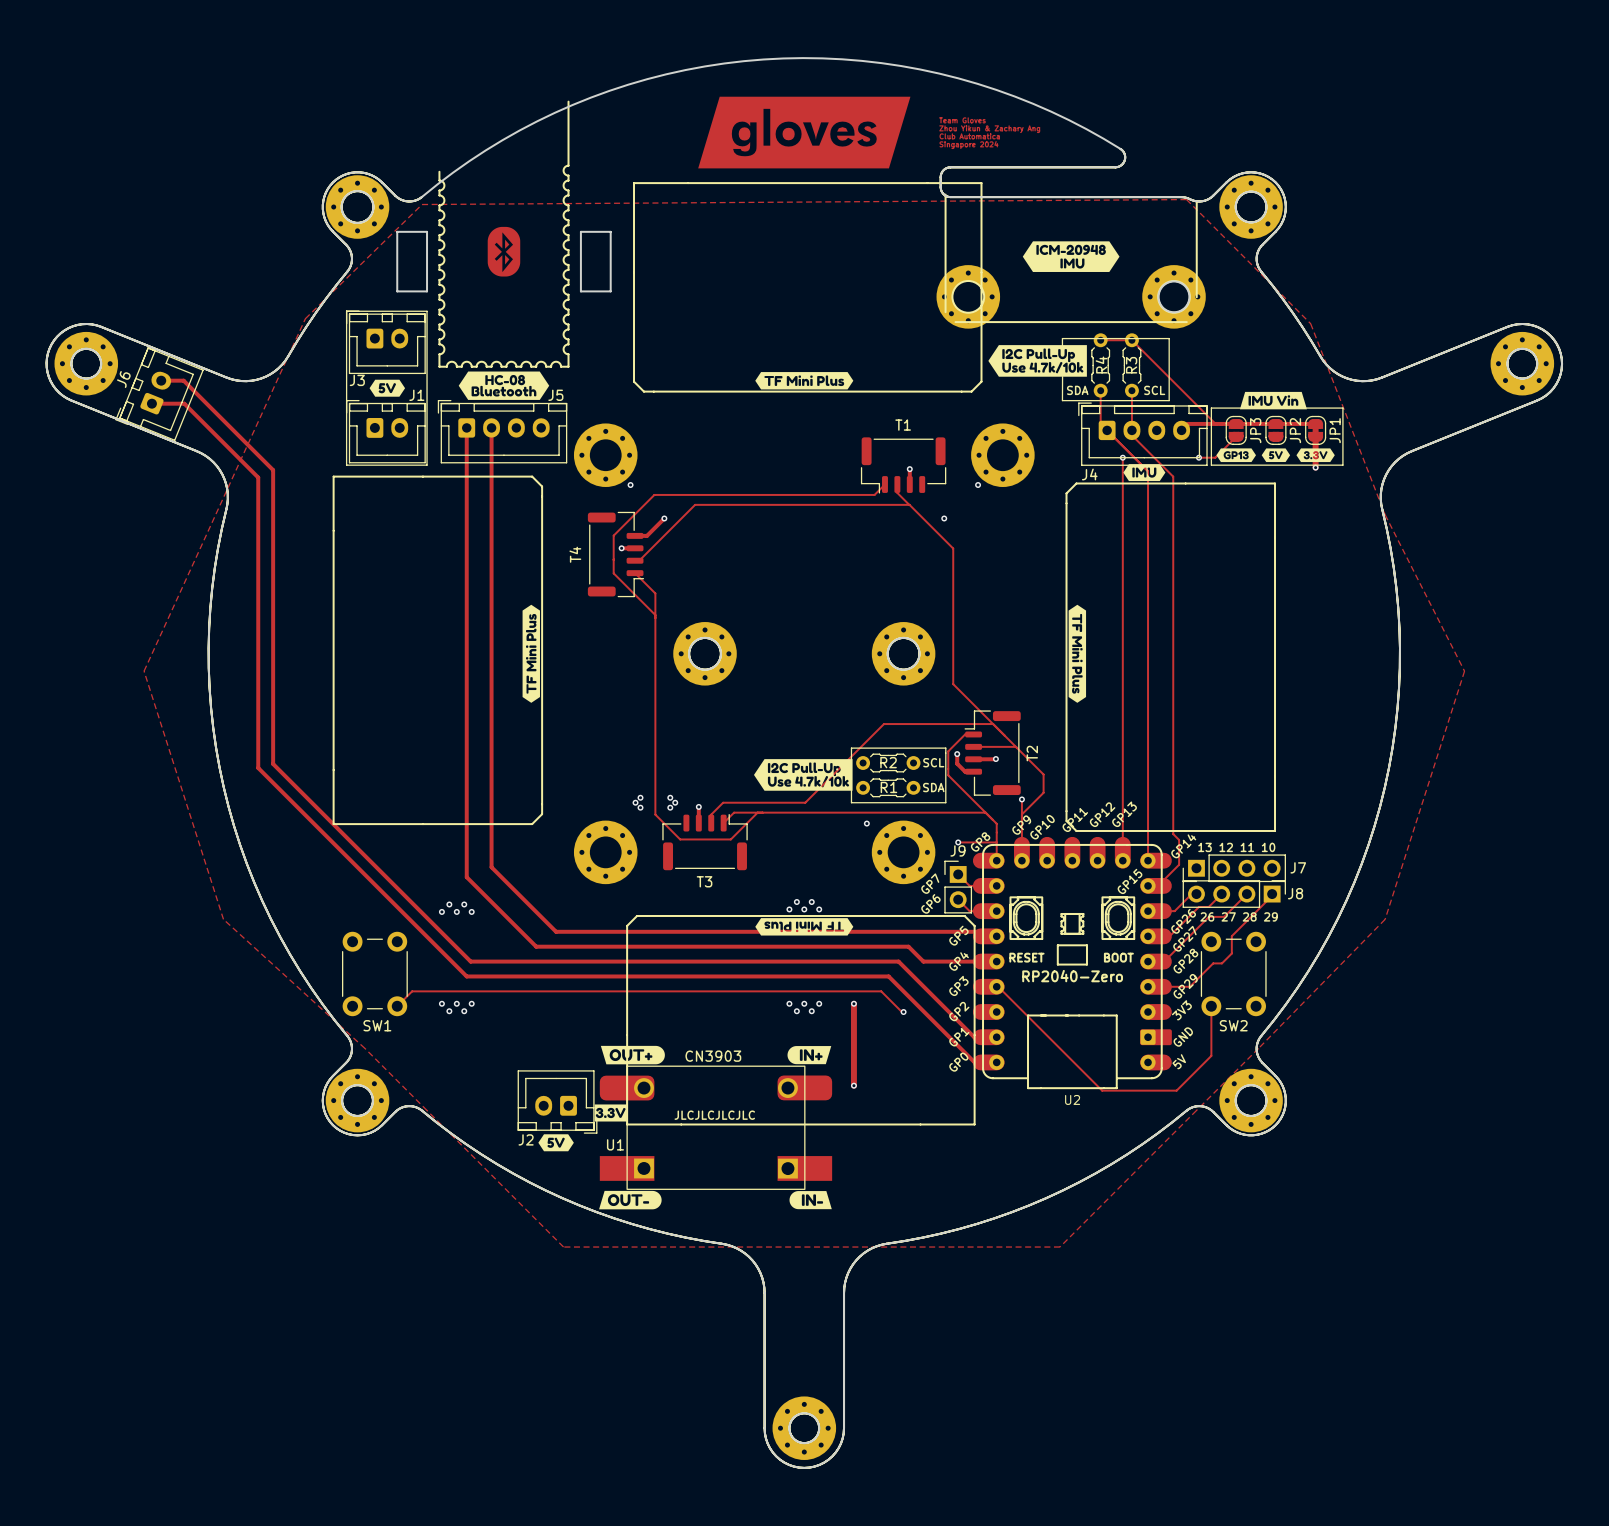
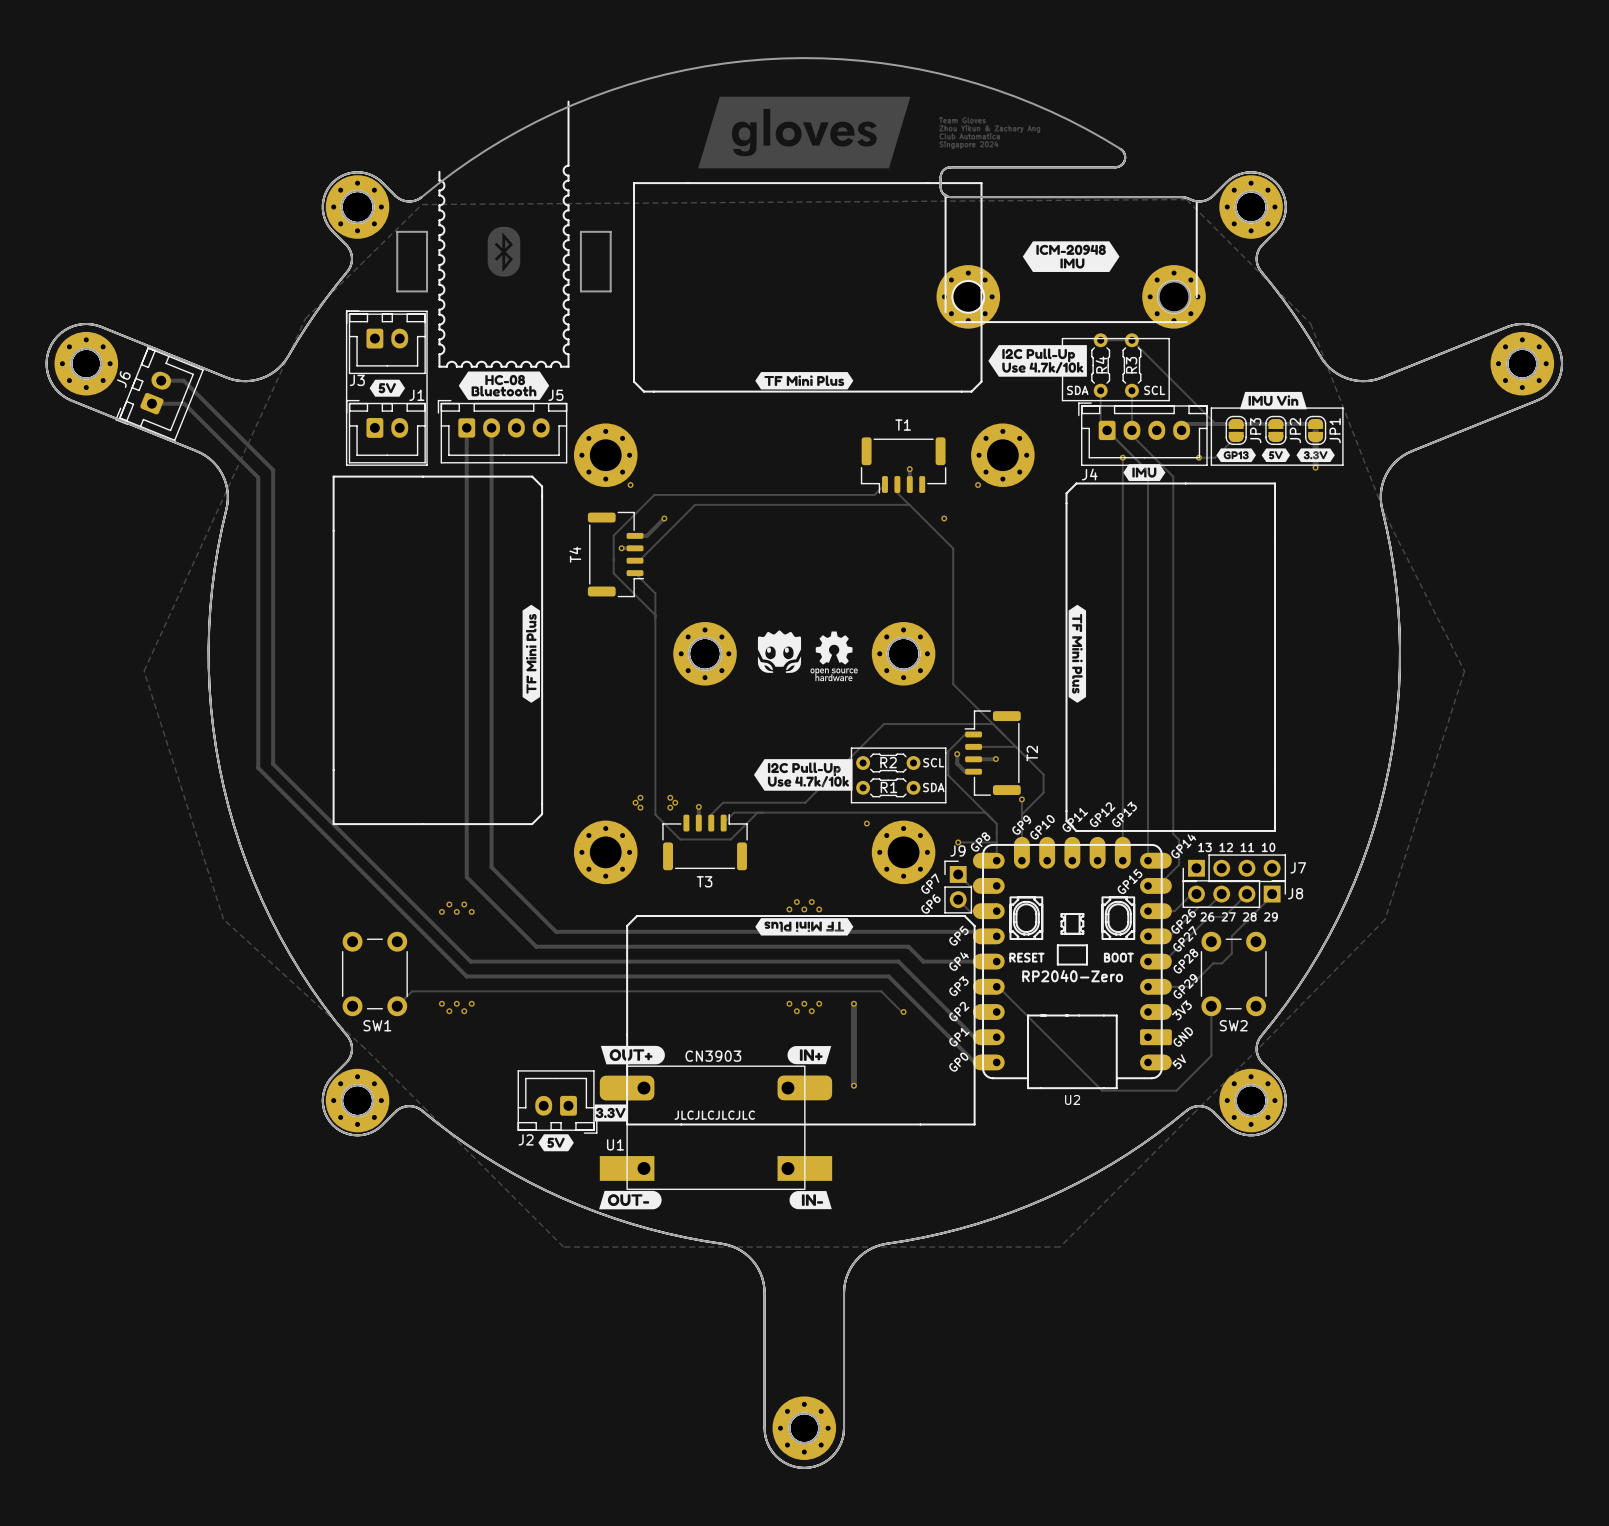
drawing: none -> [757, 630, 858, 682]

